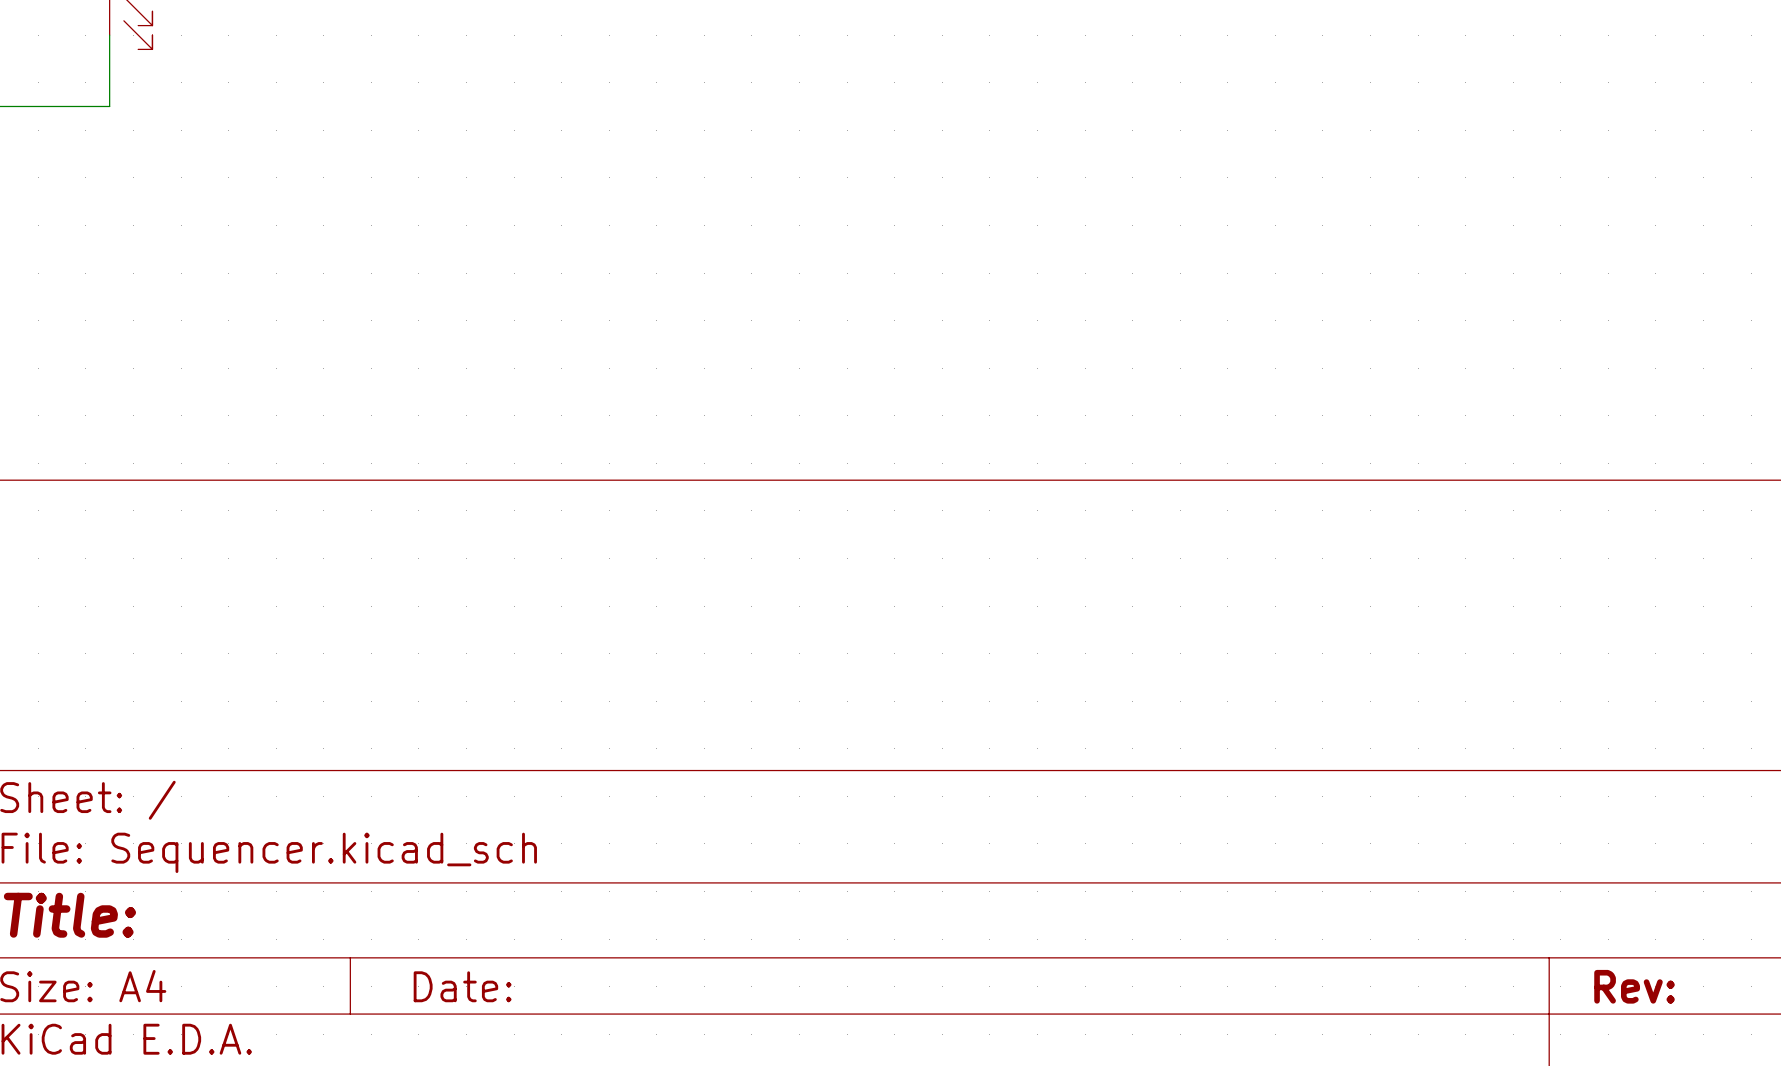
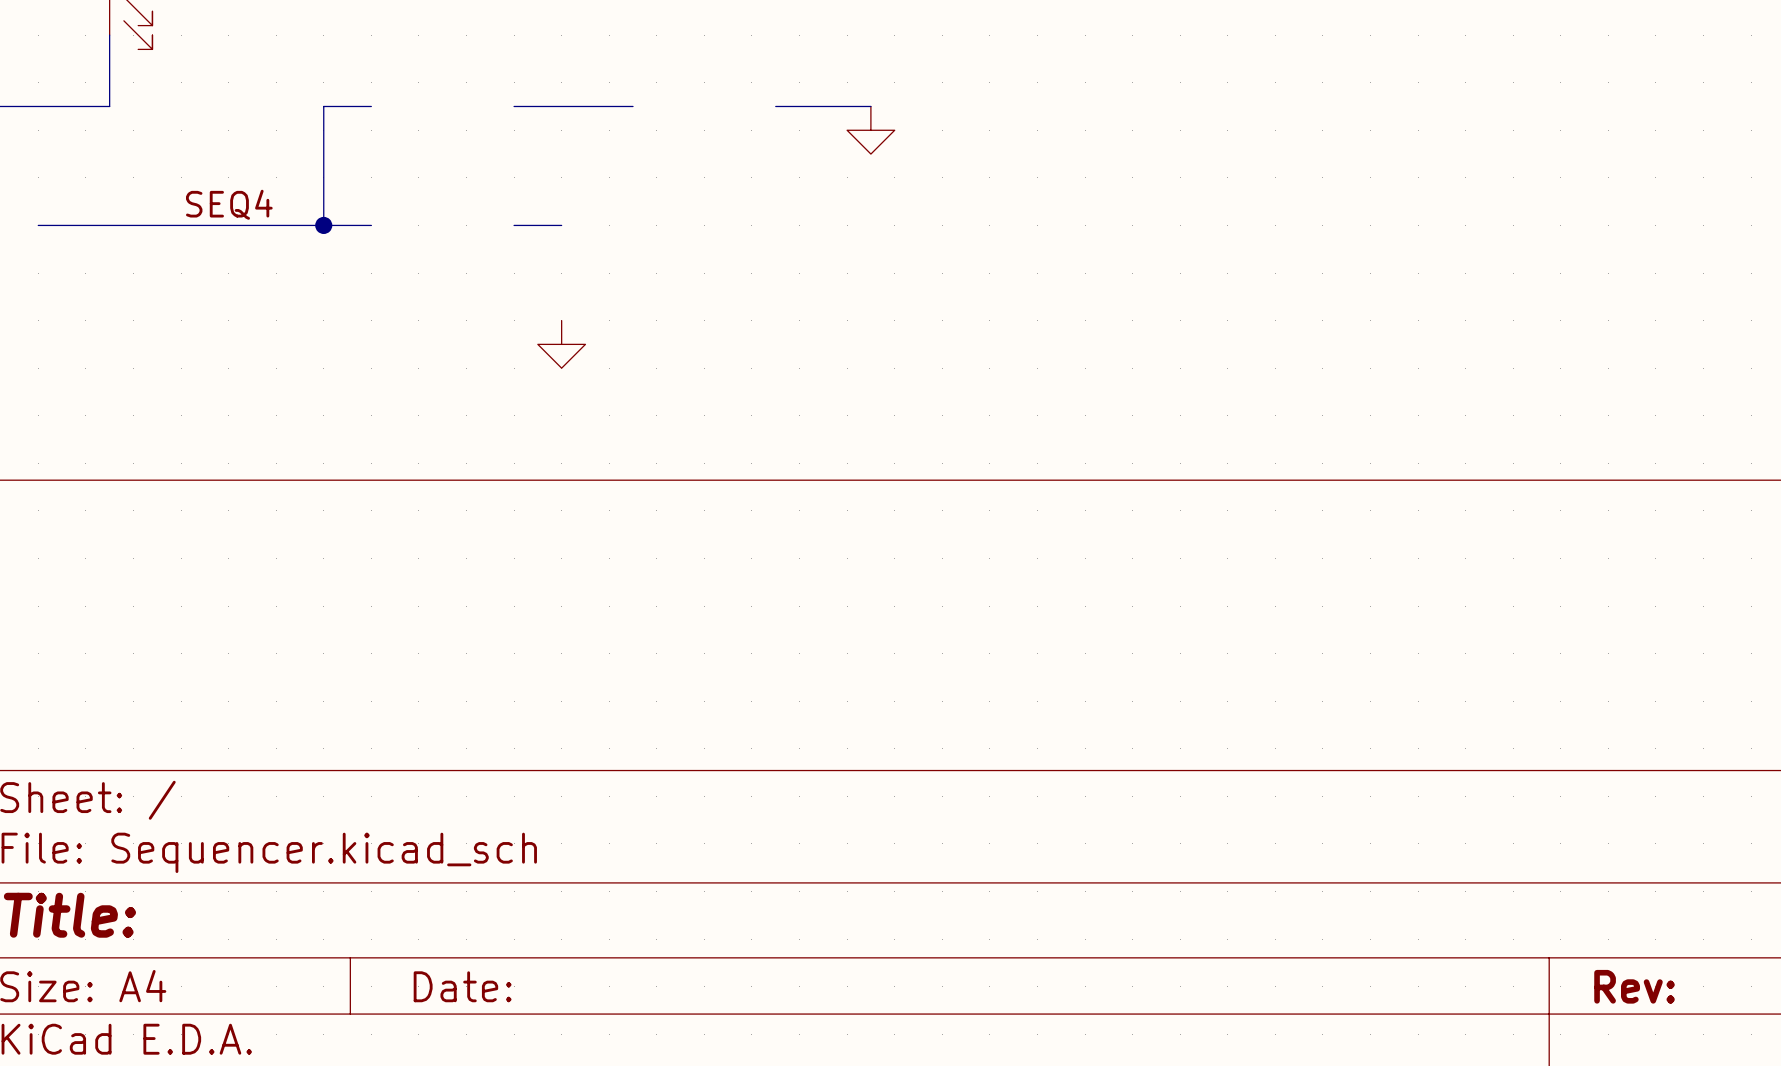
wire: none -> (371, 106) (323, 106) (323, 225)
wire: none -> (514, 106) (633, 106)
wire: none -> (775, 106) (870, 106)
power symbol: none -> (870, 130)
label: none -> SEQ4 (229, 204)
wire: none -> (38, 225) (371, 225)
junction: none -> (323, 225)
wire: none -> (514, 225) (561, 225)
power symbol: none -> (561, 344)

